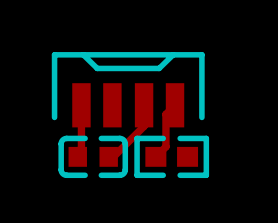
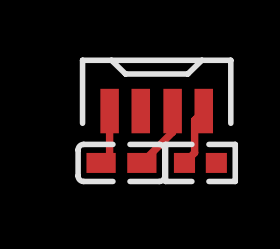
part footprint: [58, 135, 129, 179] -> [75, 141, 168, 185]

